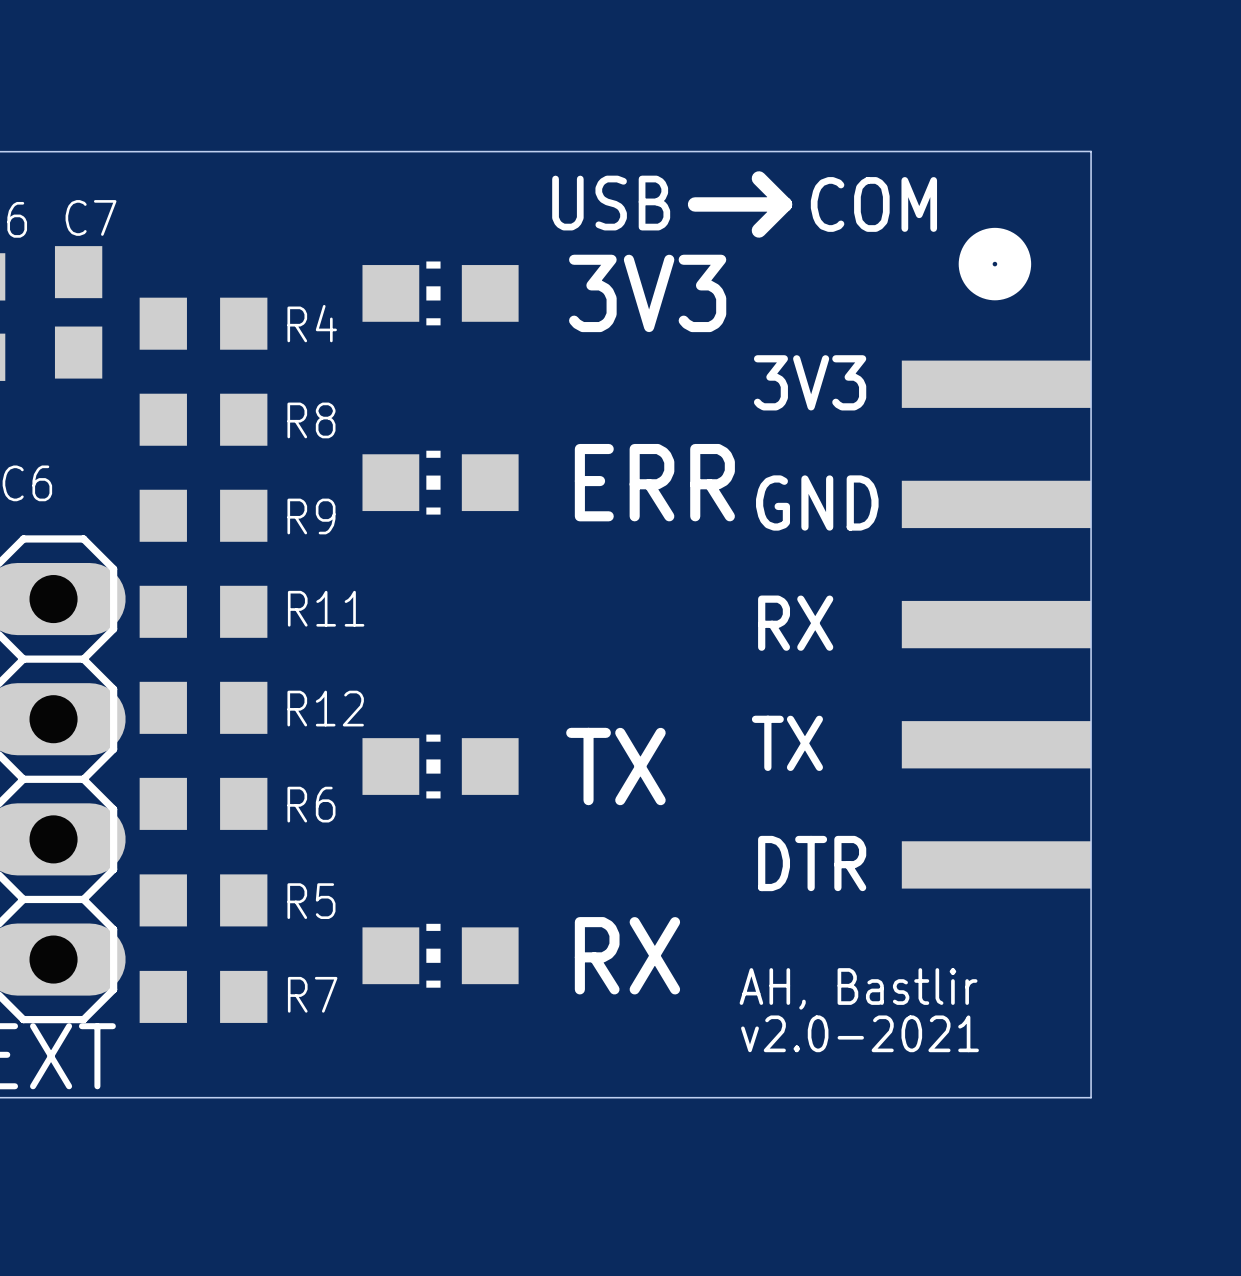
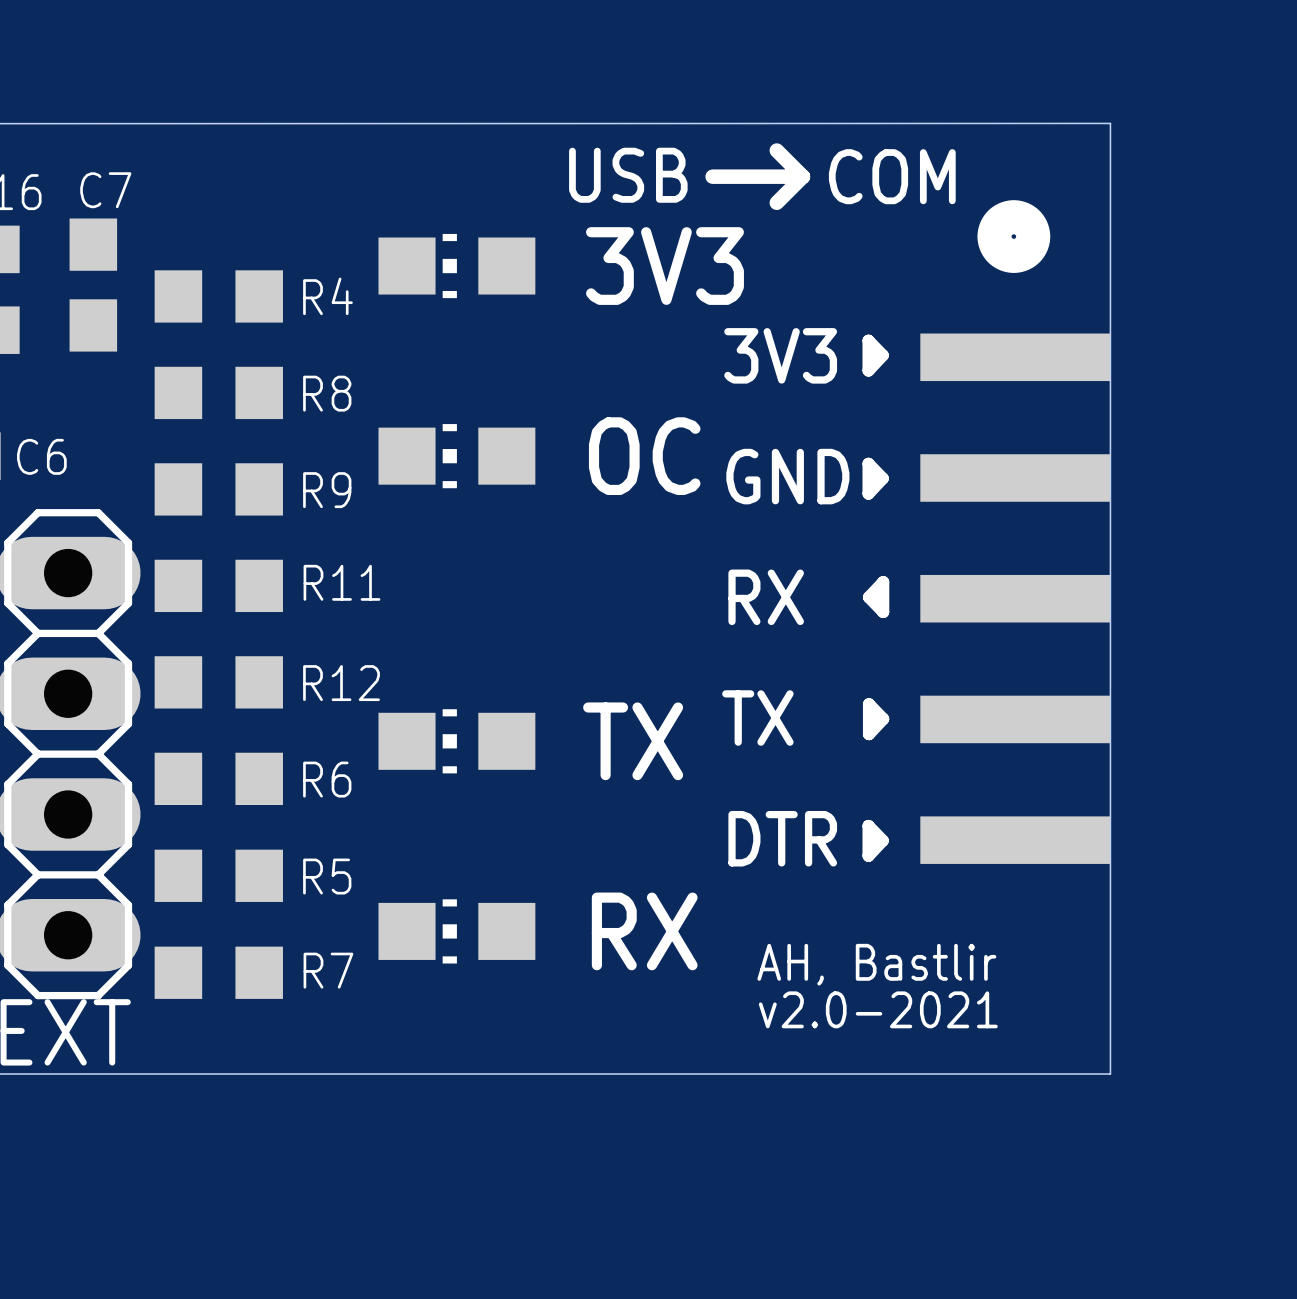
line: none -> (868, 340) (868, 370) (882, 355) (868, 340)
text position: 3V3 (810, 382) -> 3V3 (780, 355)
text: ERR (654, 482) -> OC (644, 456)
line: none -> (868, 463) (868, 493) (882, 478) (868, 463)
text position: GND (817, 503) -> GND (787, 476)
line: none -> (883, 582) (868, 597) (883, 612) (883, 582)
text position: RX (795, 623) -> RX (766, 597)
line: none -> (868, 704) (883, 718) (868, 734) (868, 704)
text position: TX (787, 743) -> TX (757, 718)
line: none -> (868, 825) (882, 840) (868, 855) (868, 825)
text position: DTR (812, 863) -> DTR (782, 838)

